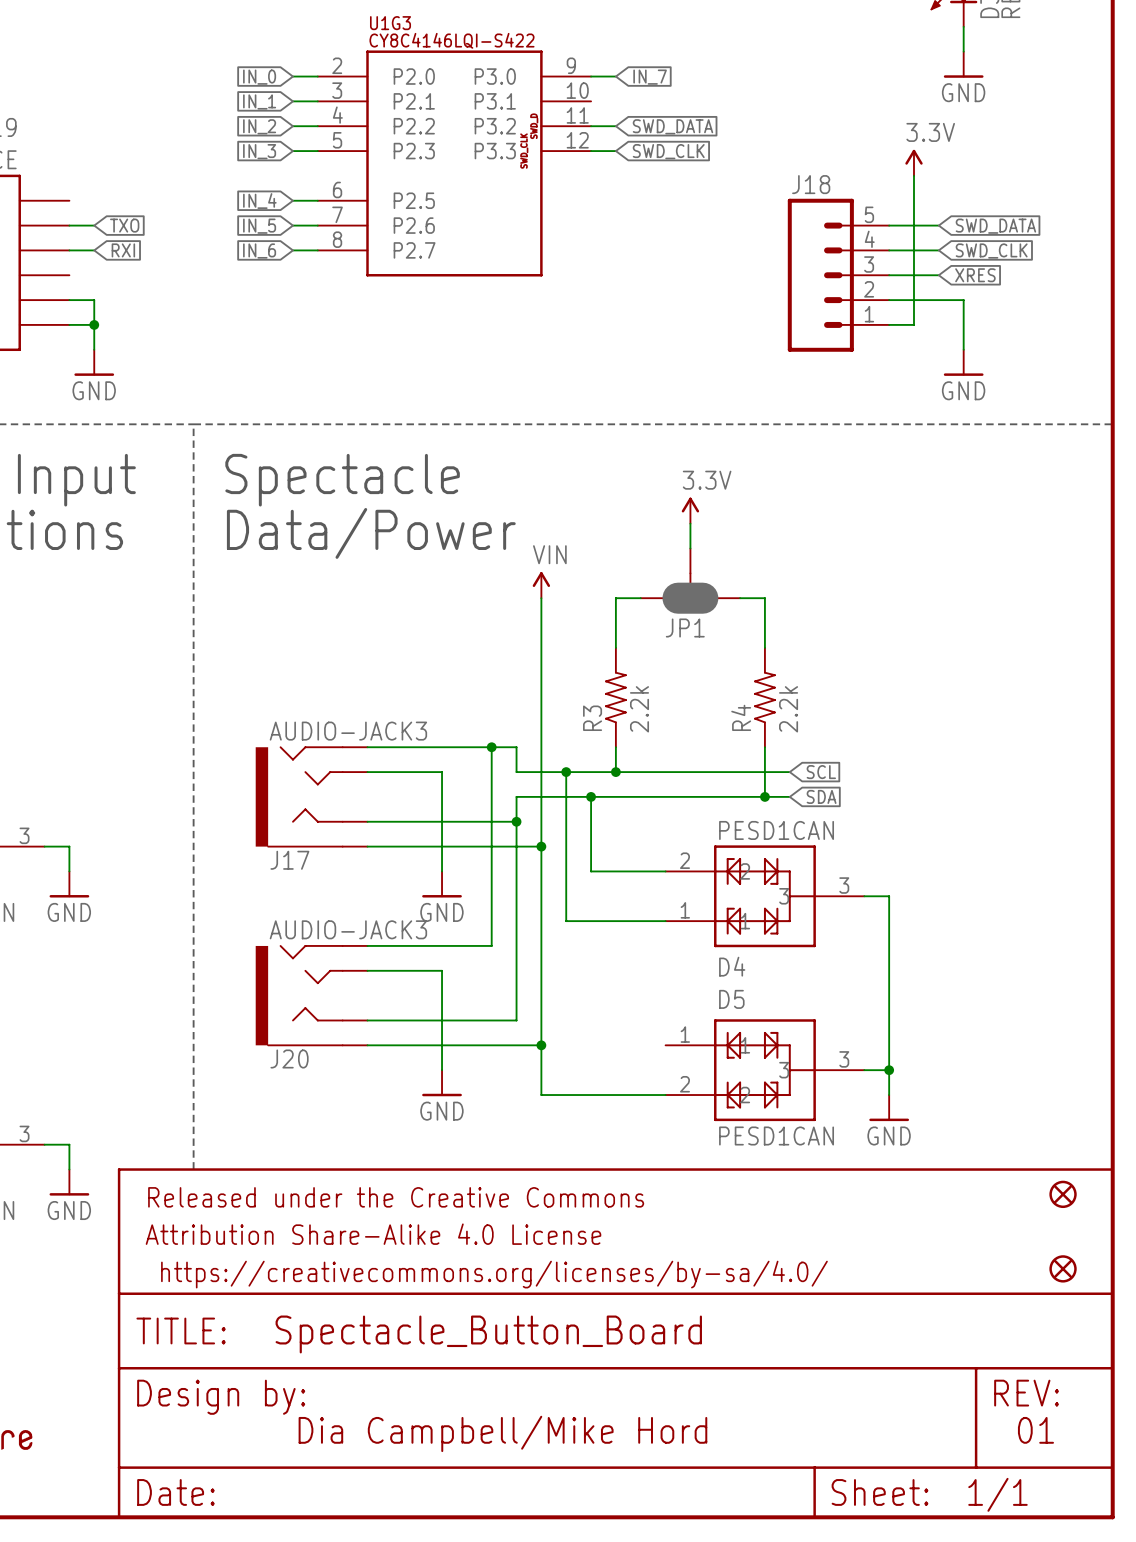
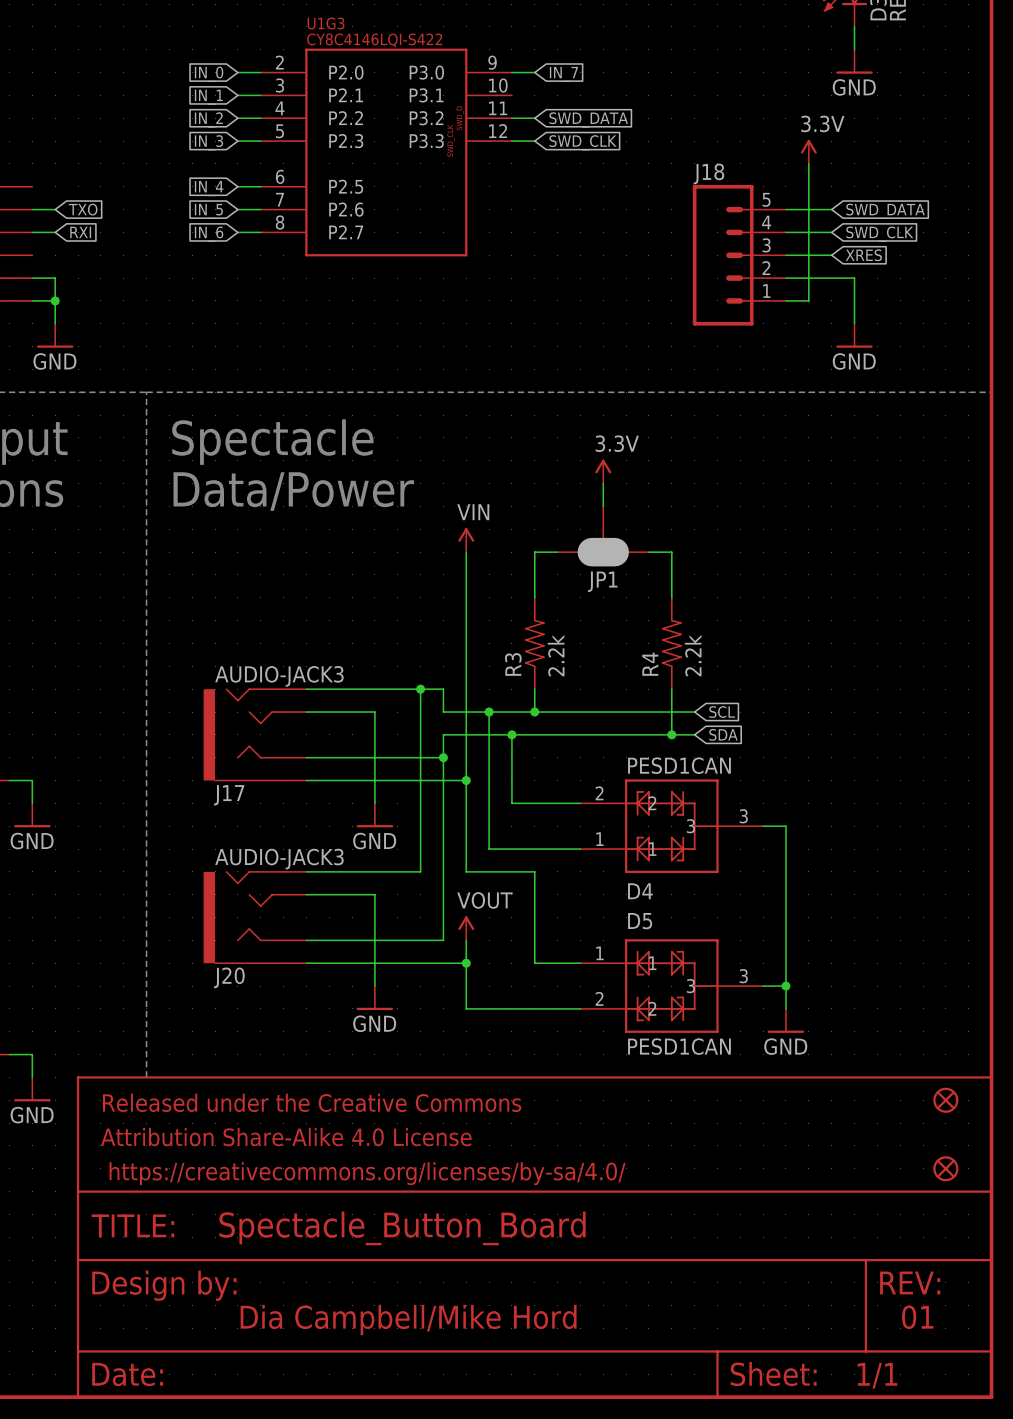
wire: (541, 945) (541, 1020) -> (466, 871) (534, 871) (534, 963) (580, 963)
power symbol: none -> VOUT (466, 928)

